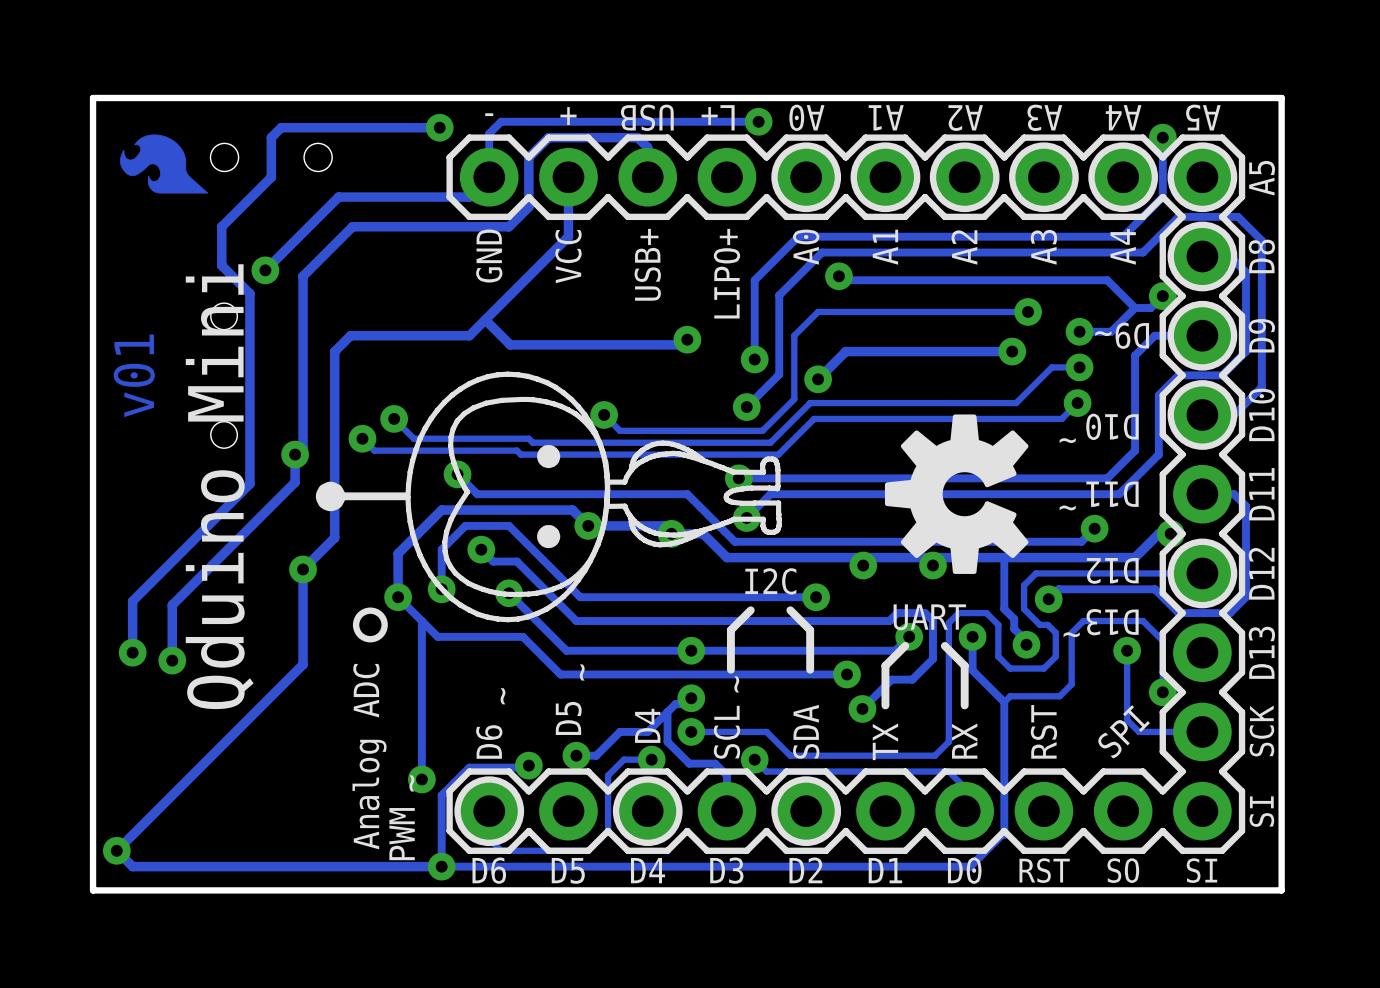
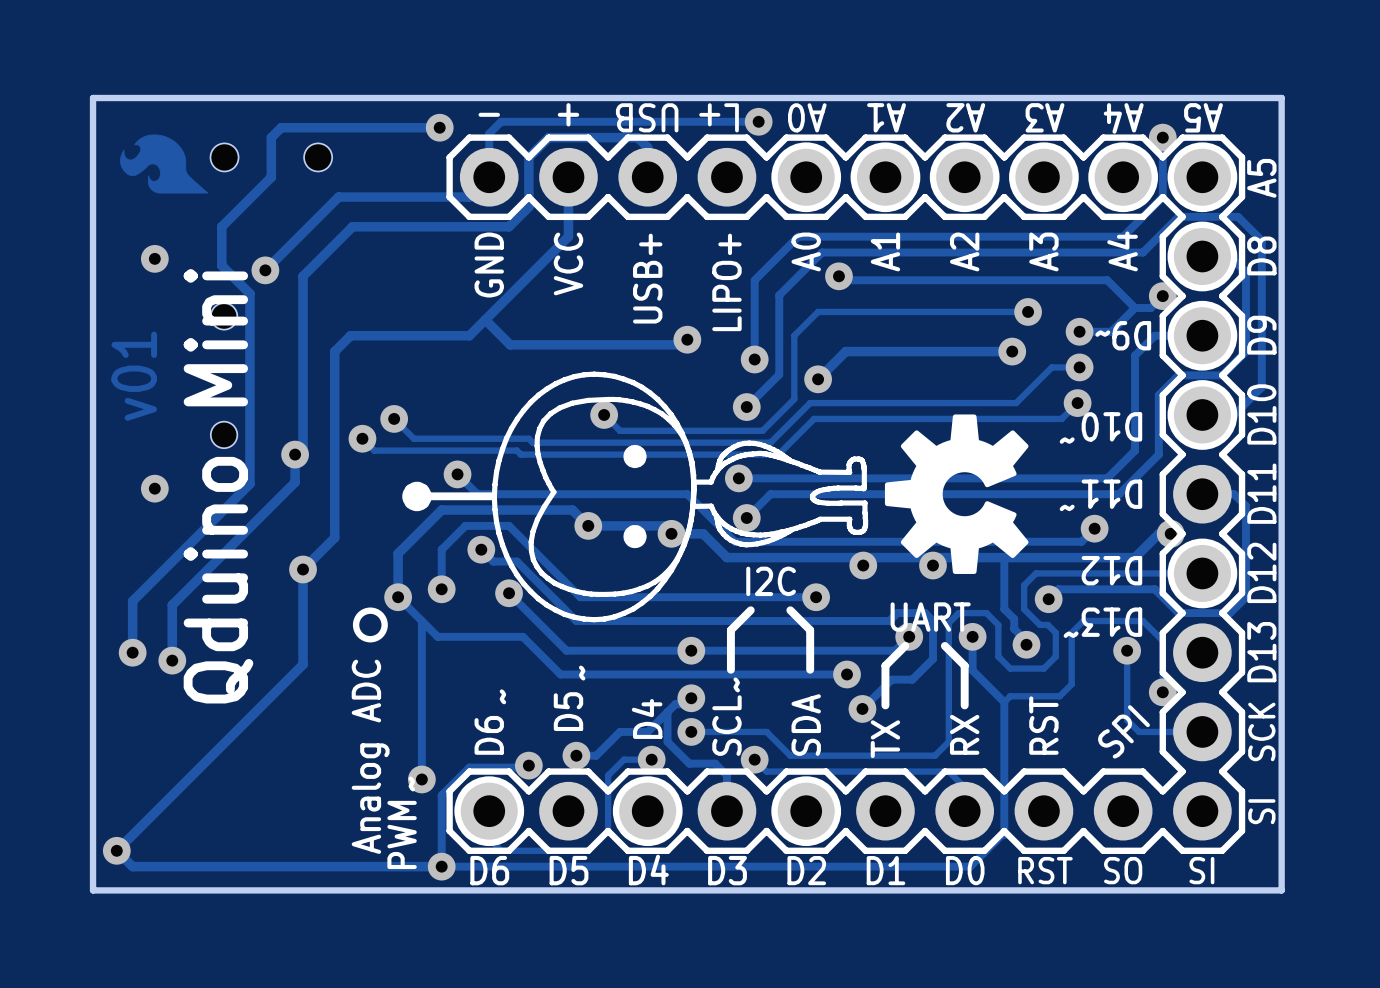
via: none -> (154, 258)
via: none -> (154, 488)
drawing position: (548, 496) -> (635, 496)

